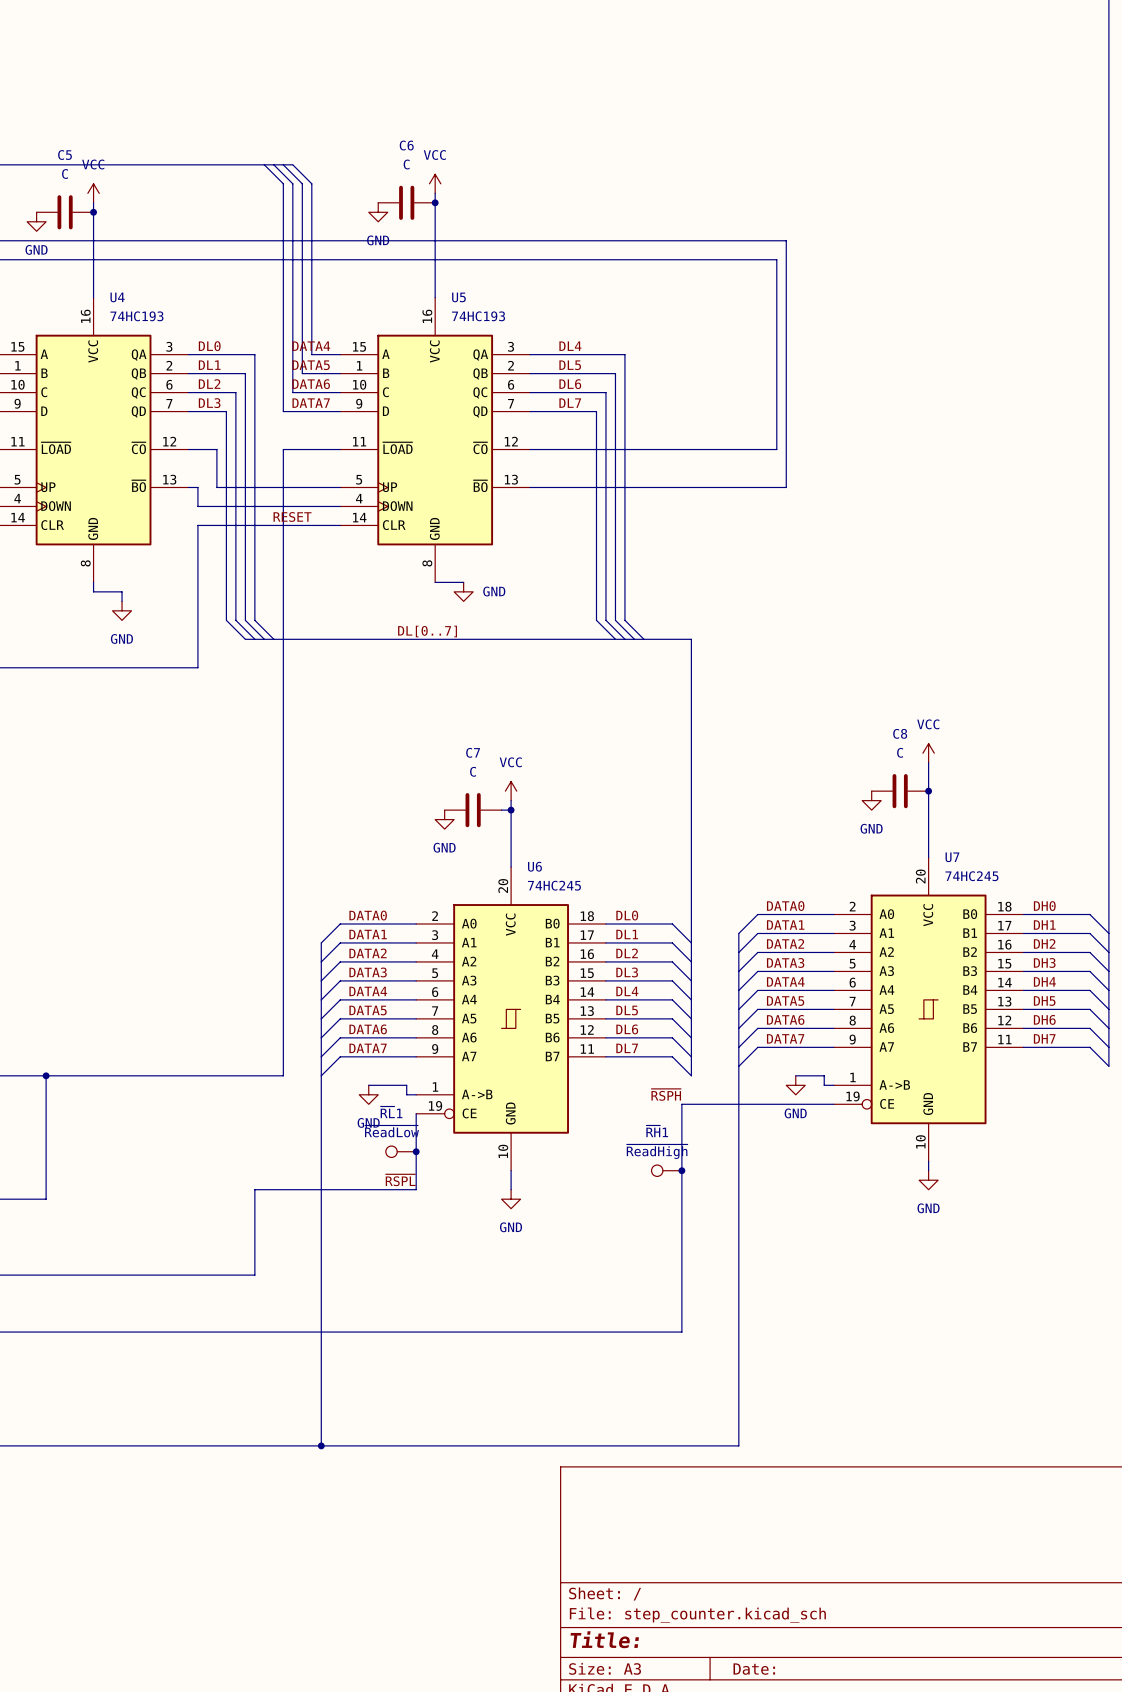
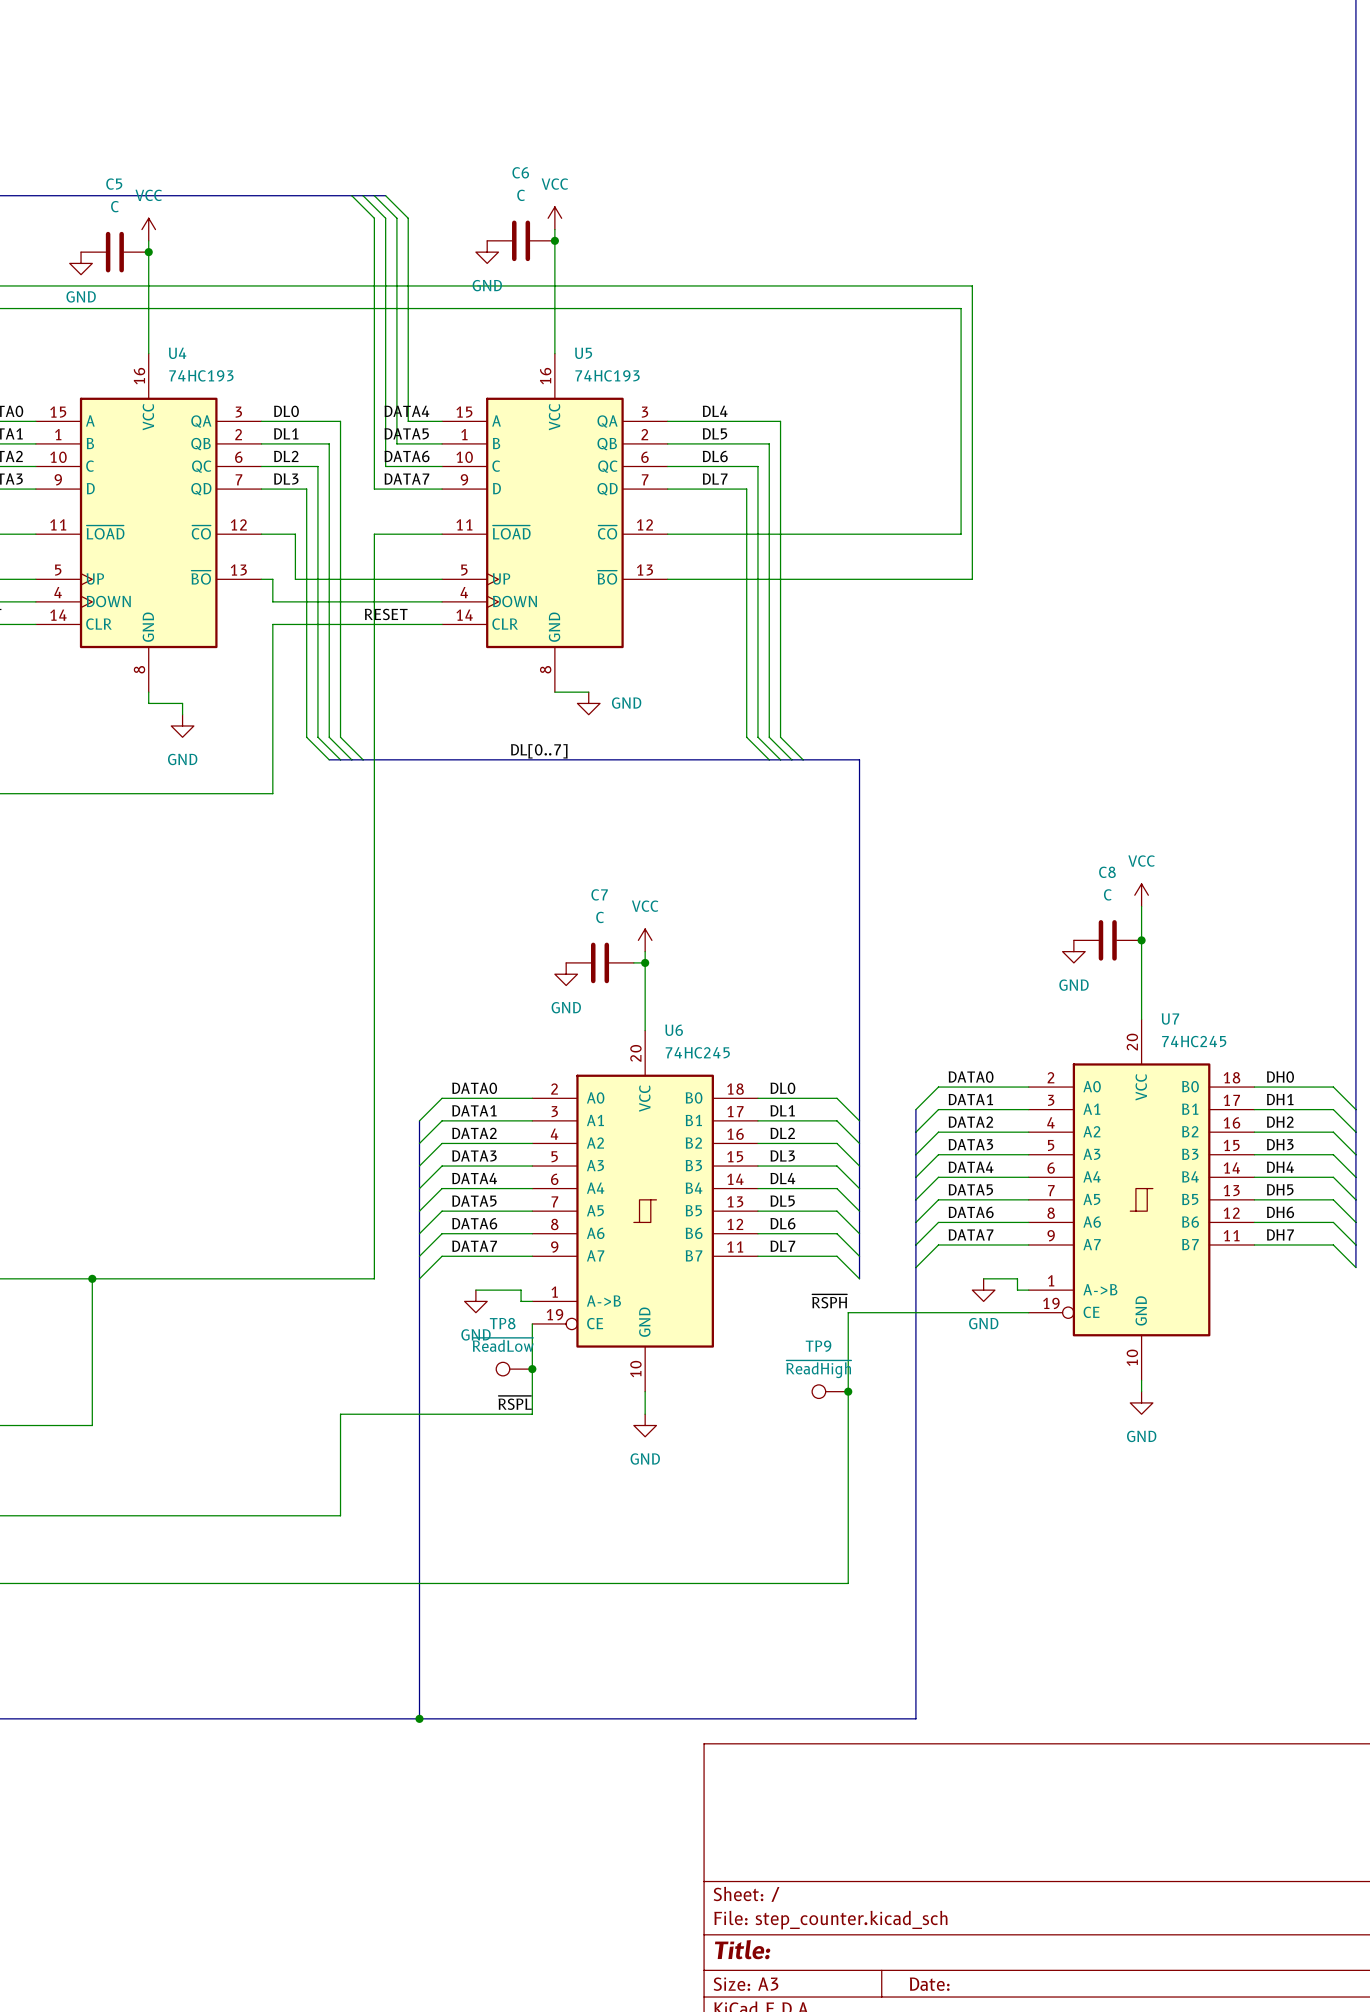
~{RL}1 name: ~{RL}1 (391, 1112) -> TP8 (502, 1323)
~{RH}1 name: ~{RH}1 (657, 1131) -> TP9 (818, 1346)

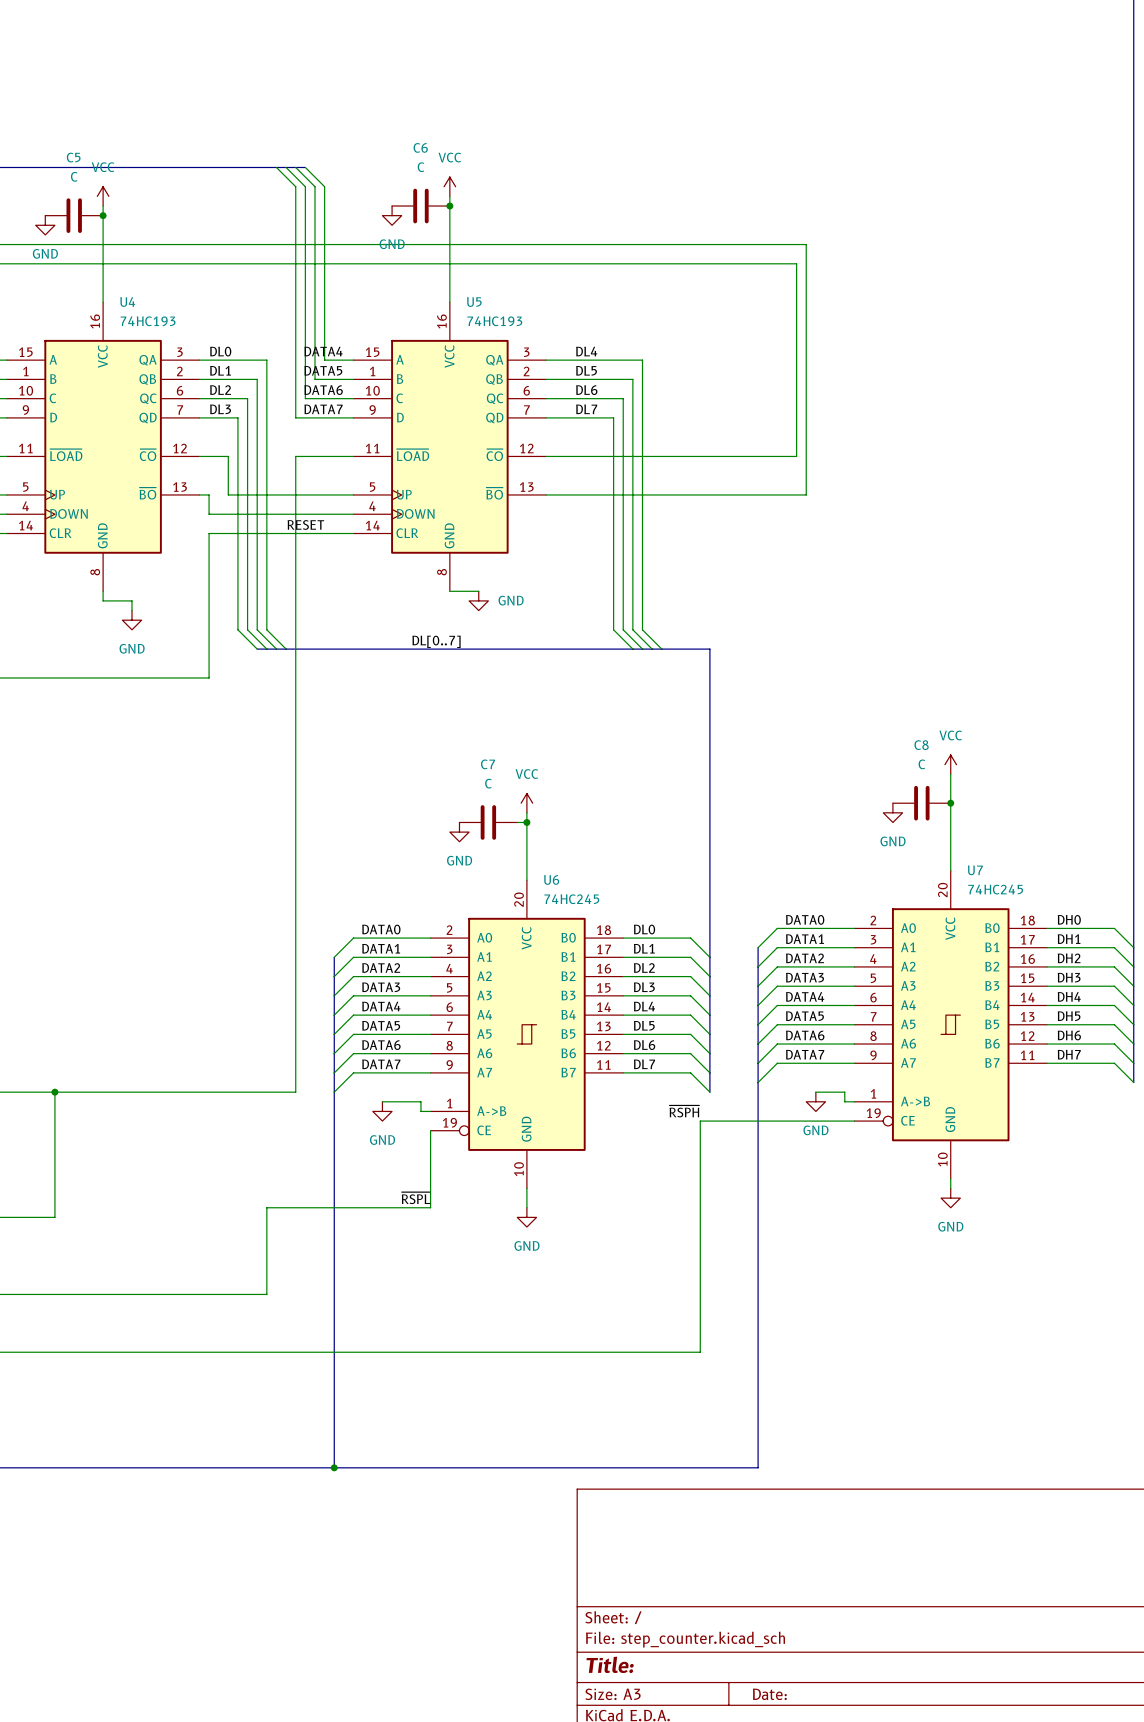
TP8: ~{ReadLow} (514, 1369) -> none
junction: (532, 1369) -> none
TP9: ~{ReadHigh} (830, 1391) -> none
junction: (848, 1391) -> none

